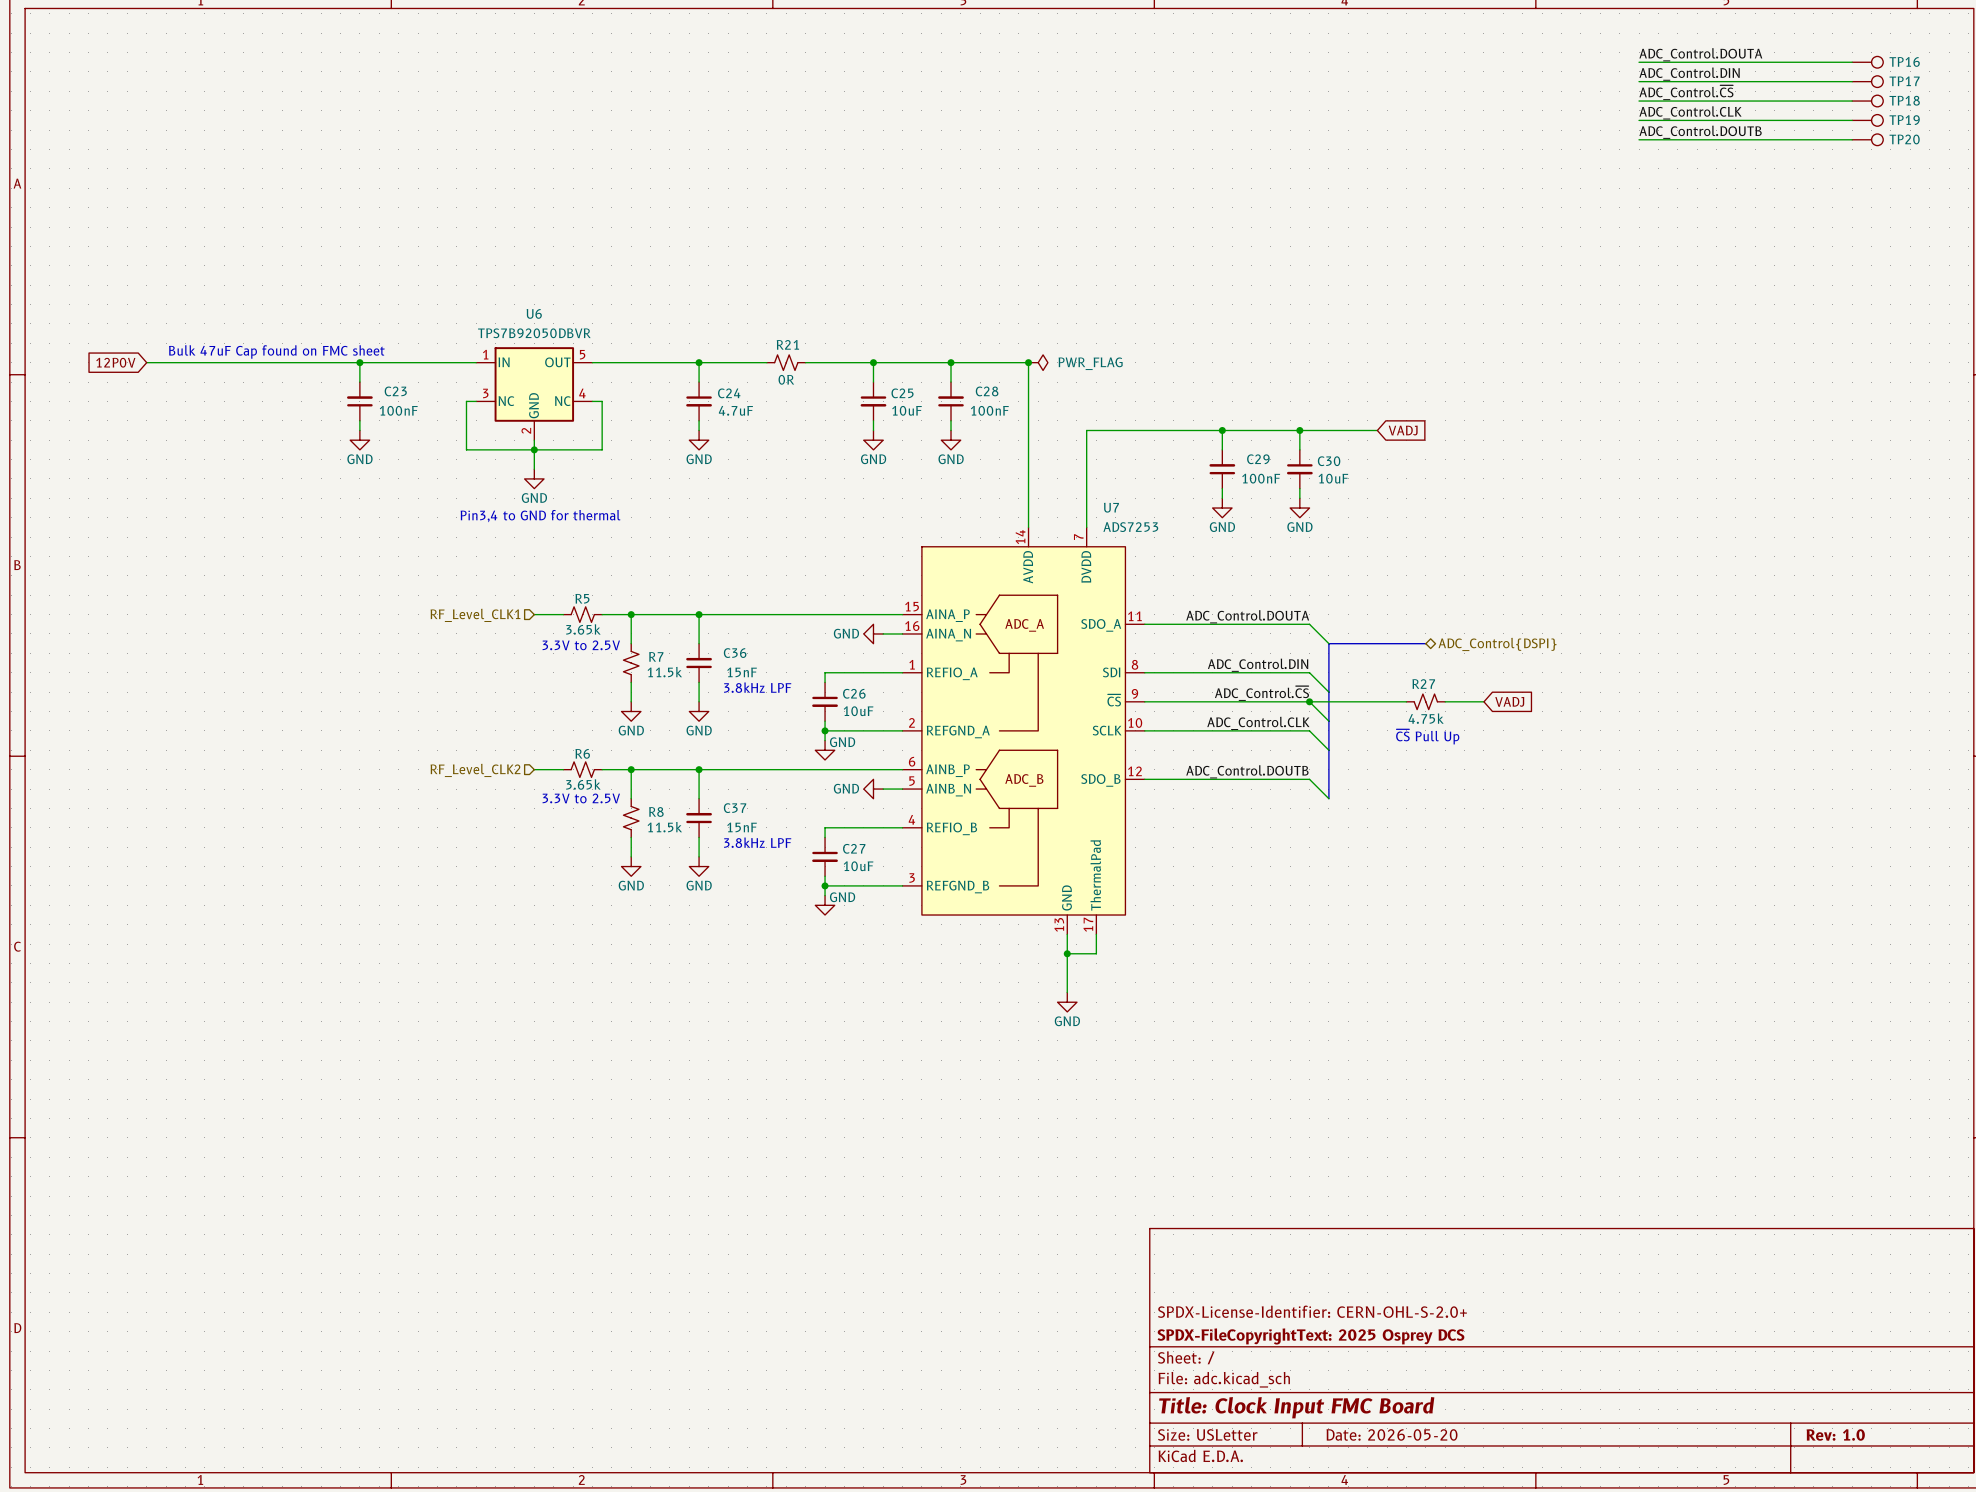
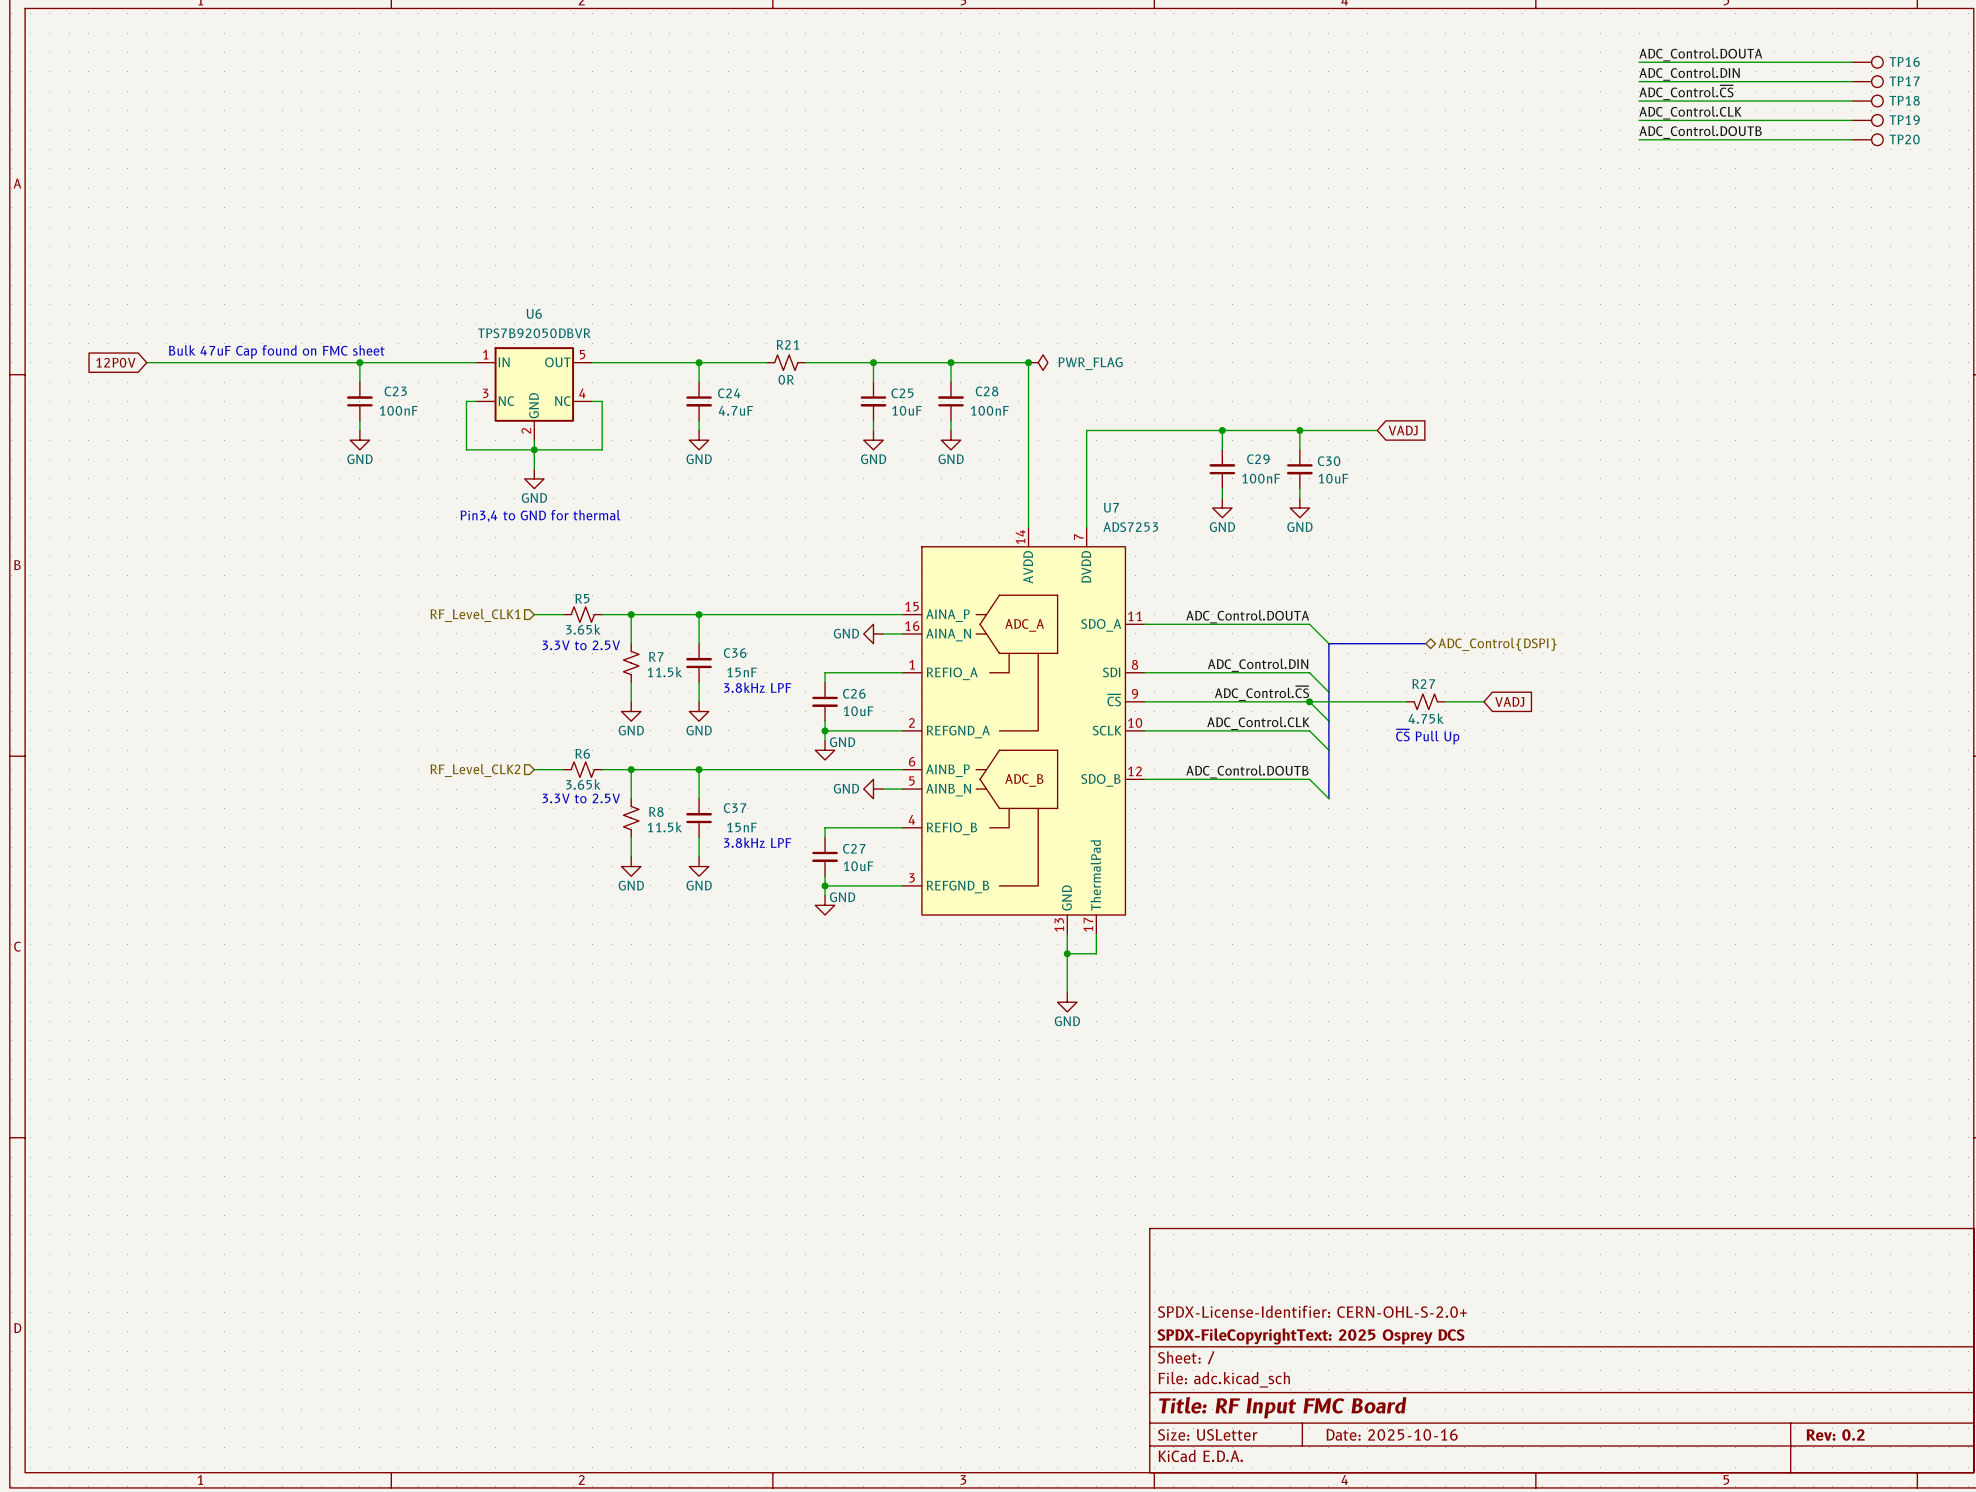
title block: Title: Clock Input FMC Board (1296, 1407) -> Title: RF Input FMC Board (1282, 1407)
title block: Date: 2026-05-20 (1392, 1434) -> Date: 2025-10-16 (1392, 1434)
title block: Rev: 1.0 (1835, 1434) -> Rev: 0.2 (1835, 1435)

